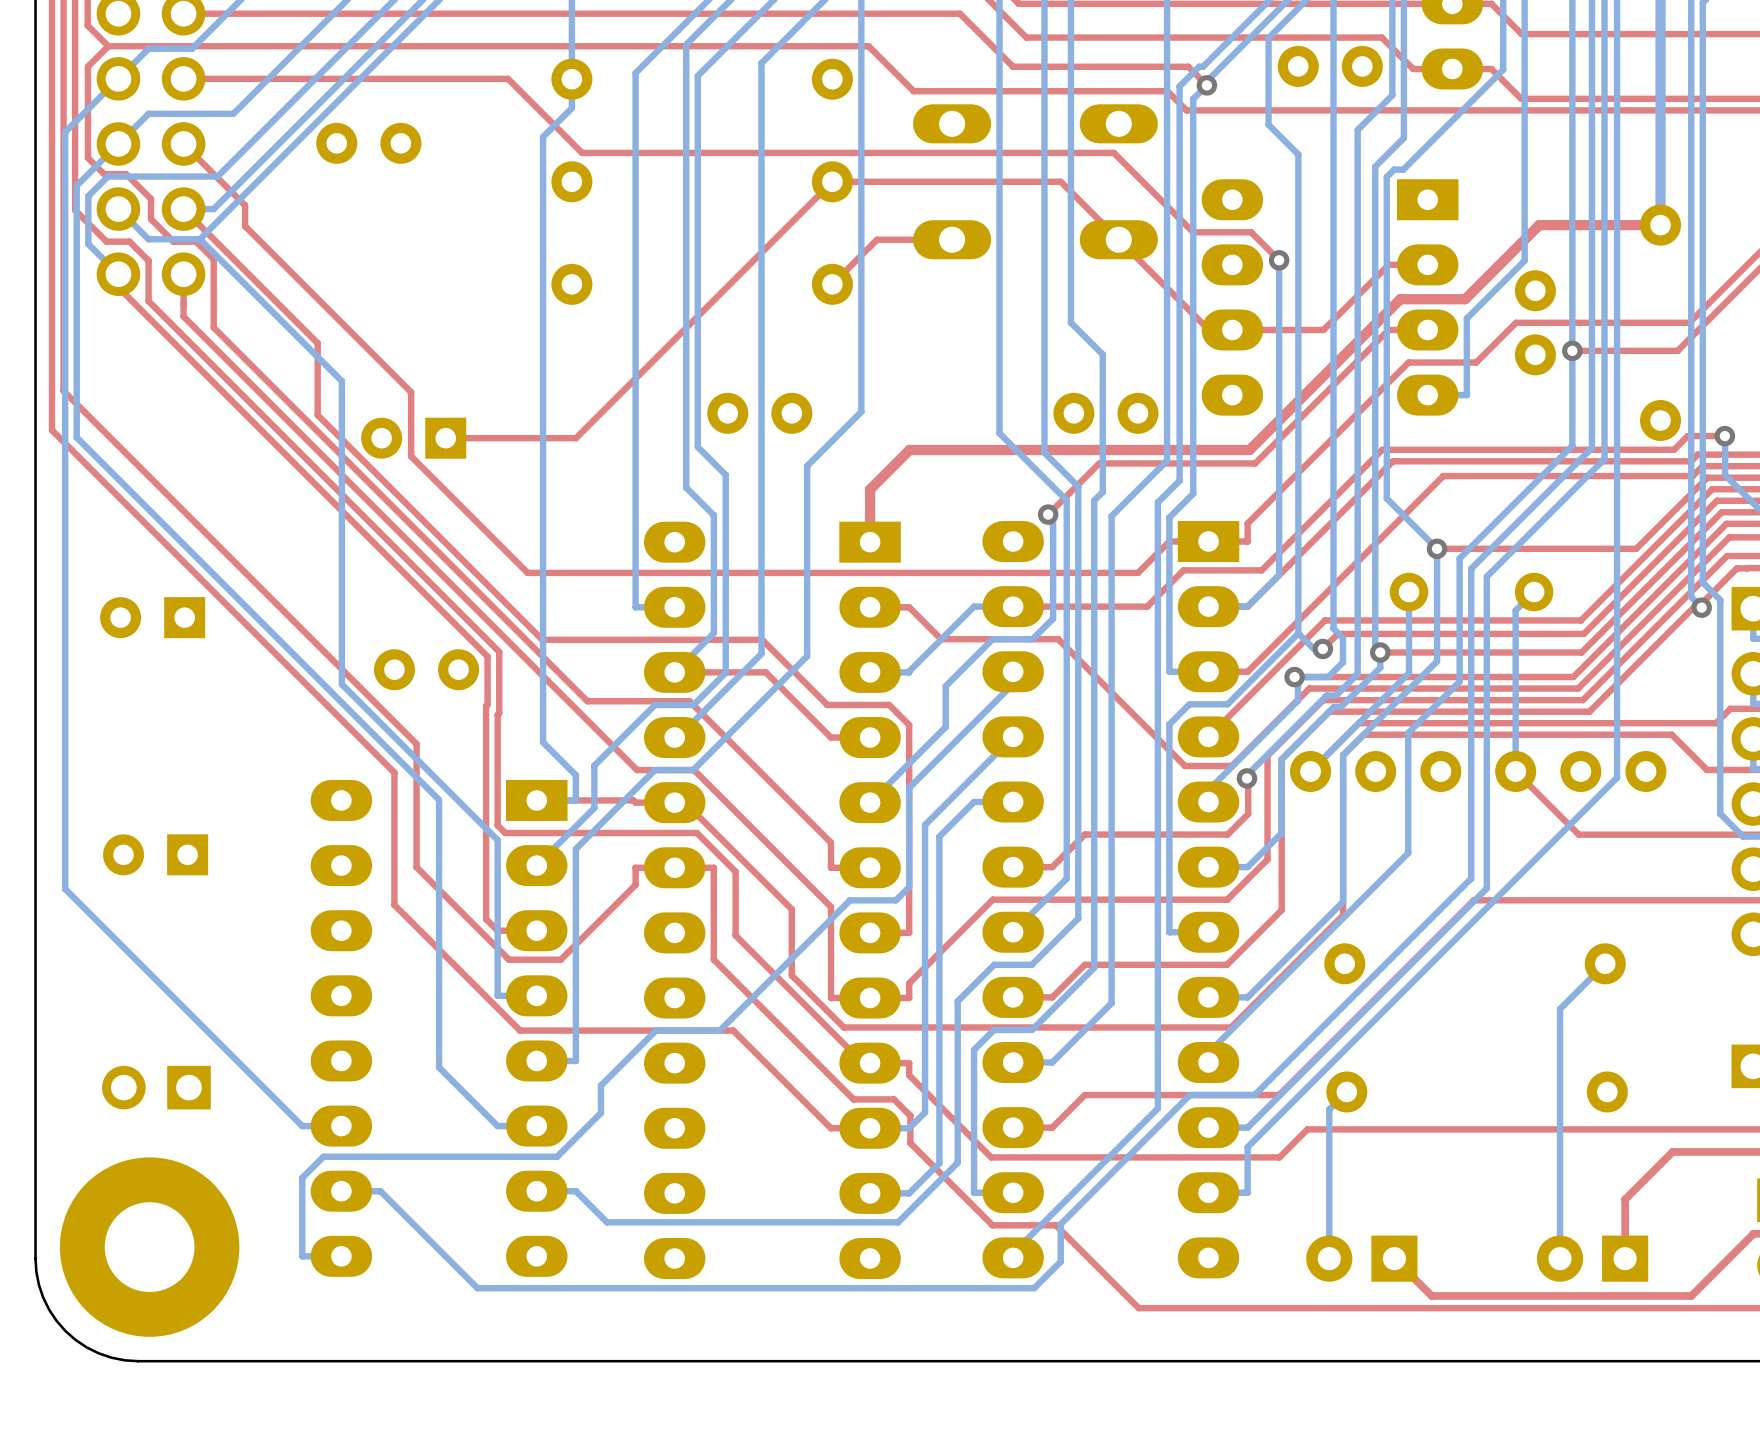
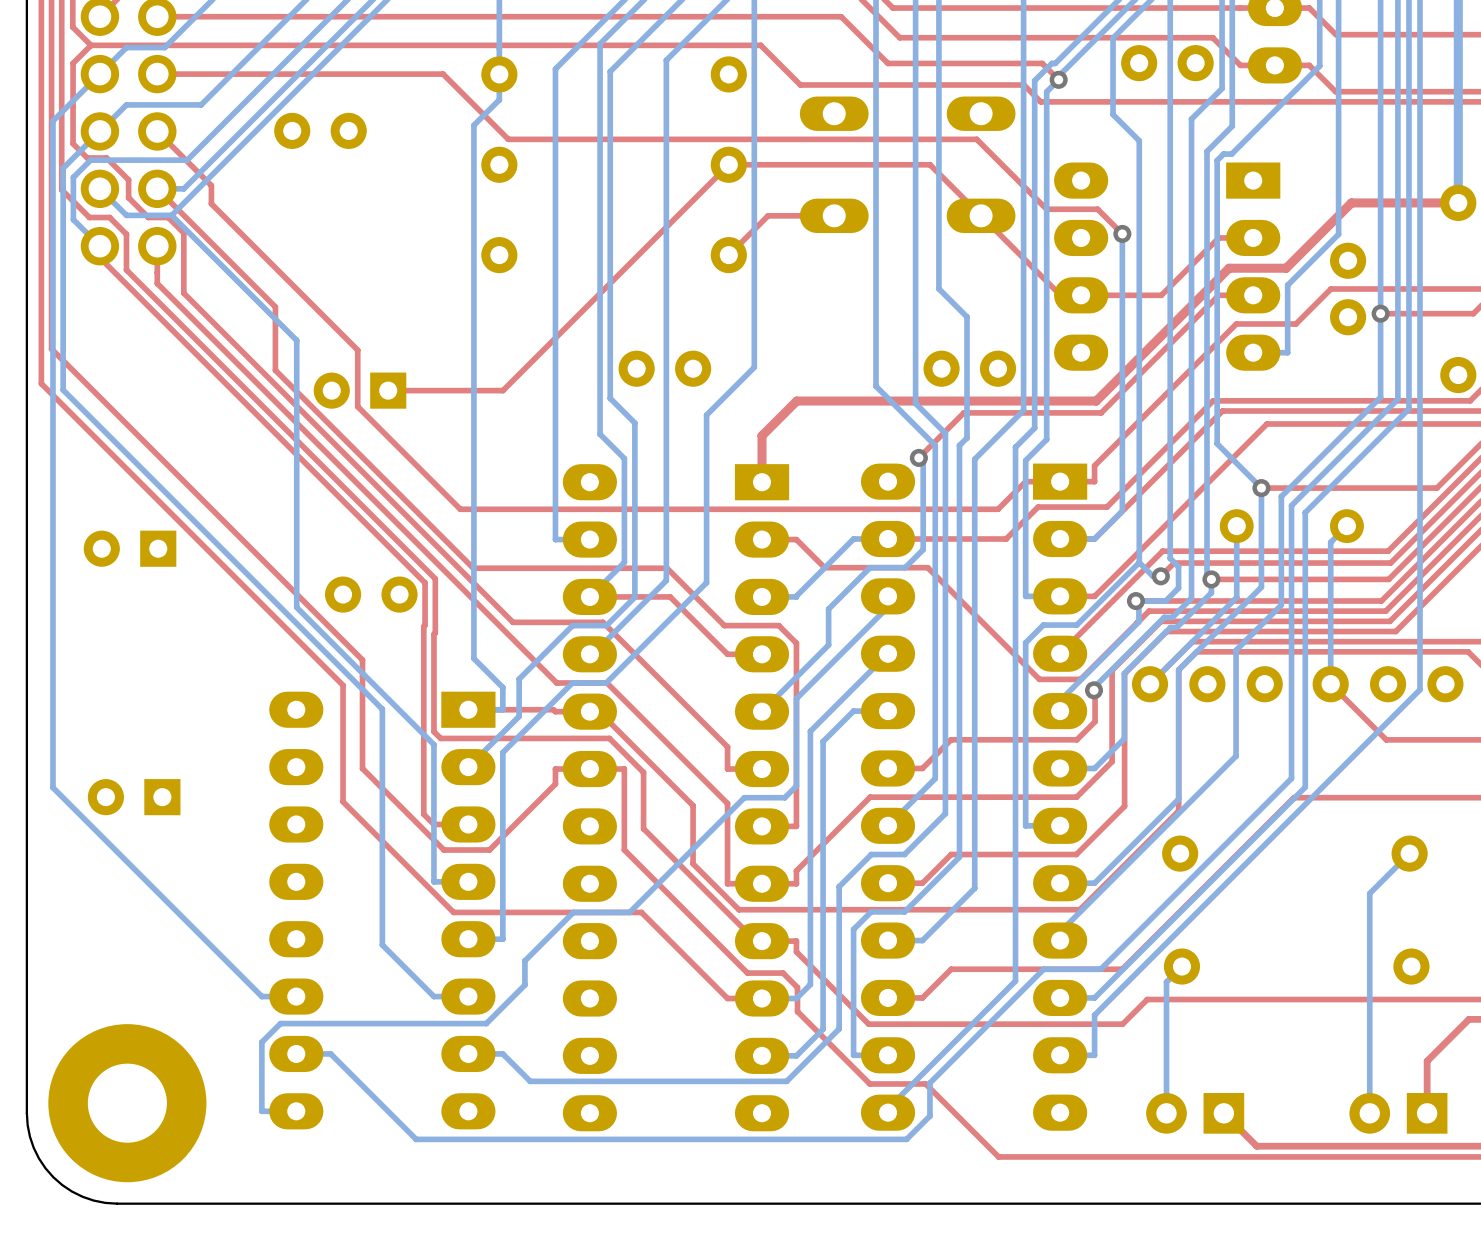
part position: (155, 854) -> (134, 797)
part: (156, 1087) -> none

